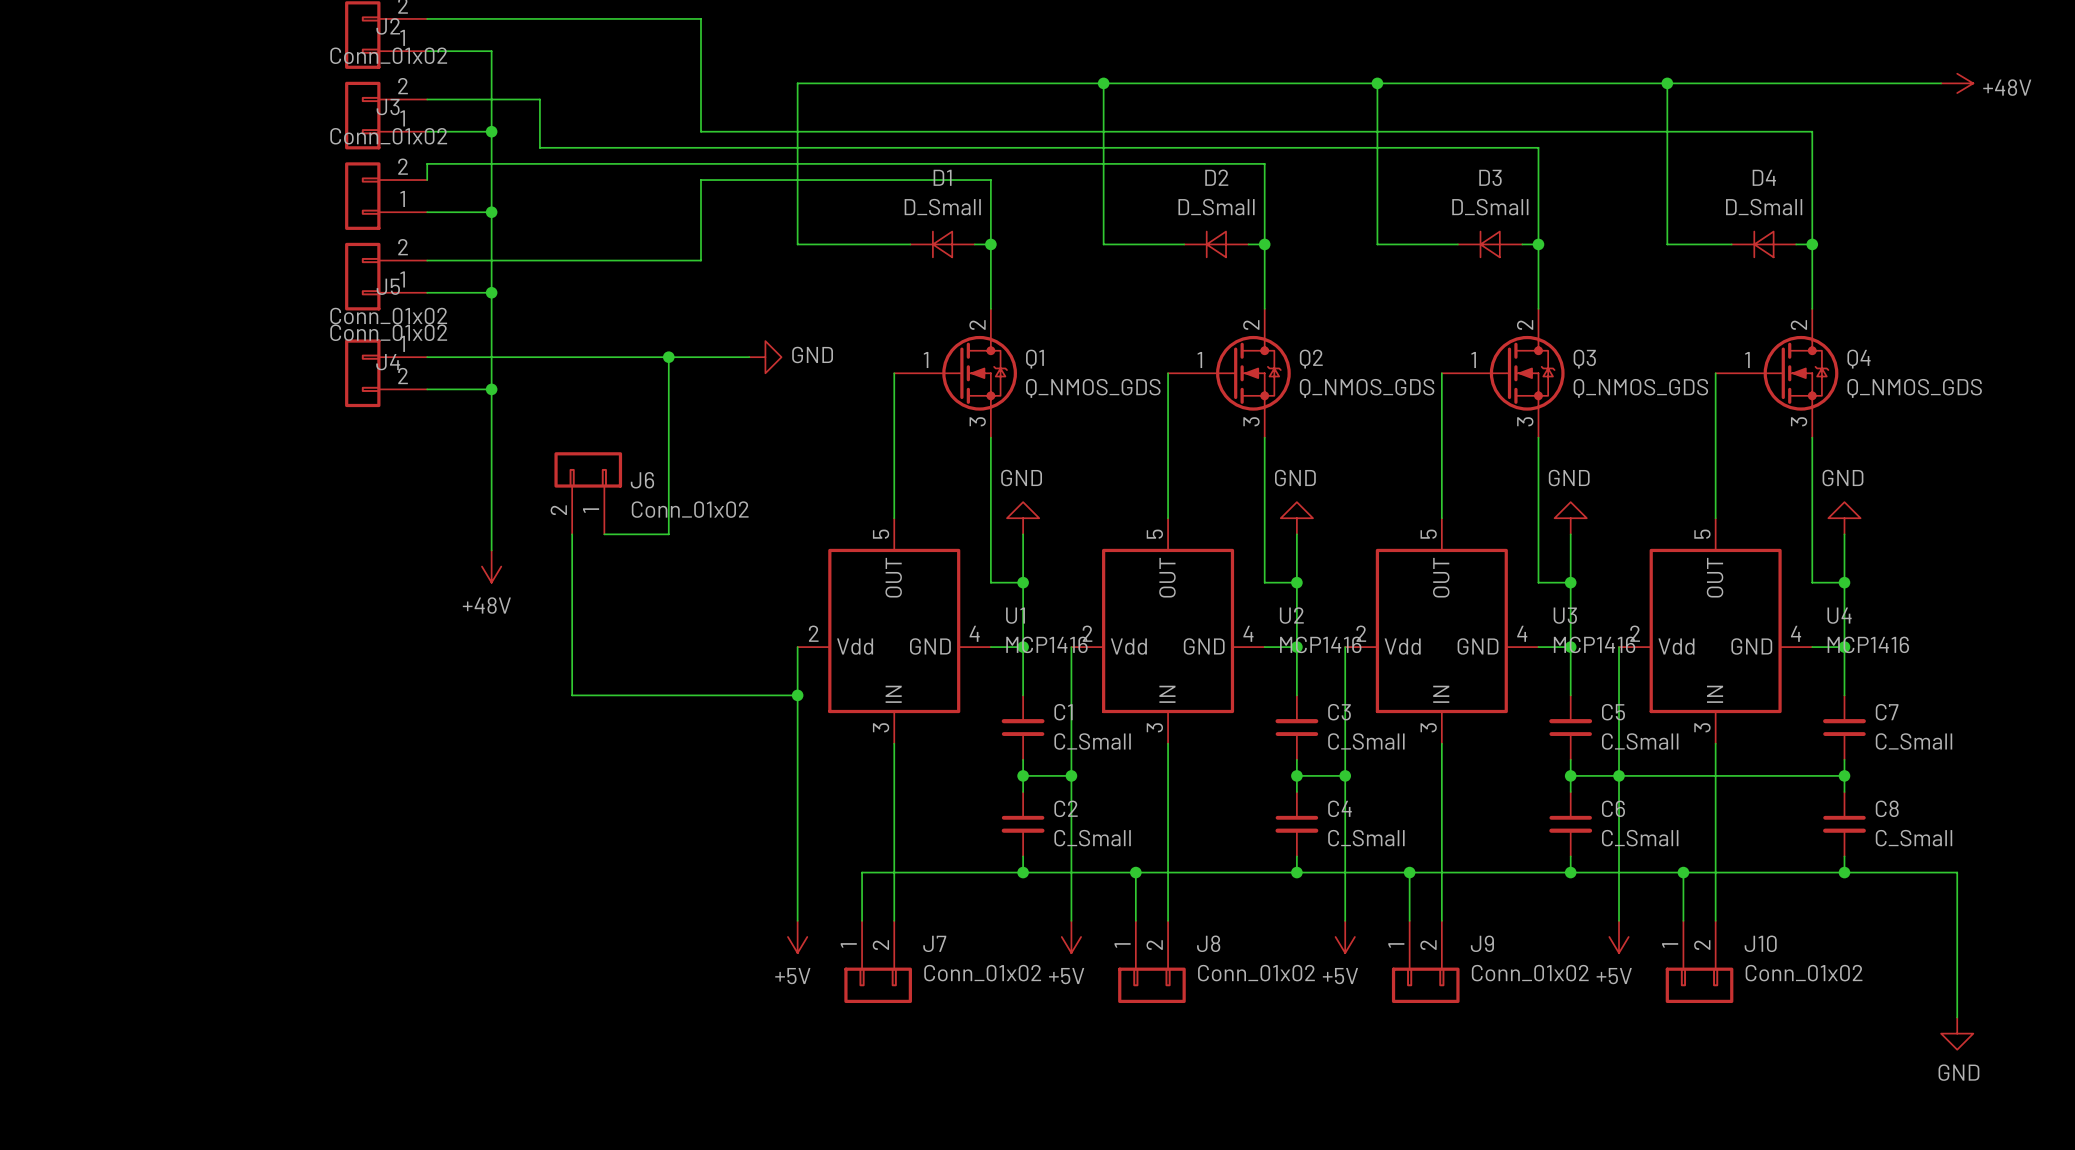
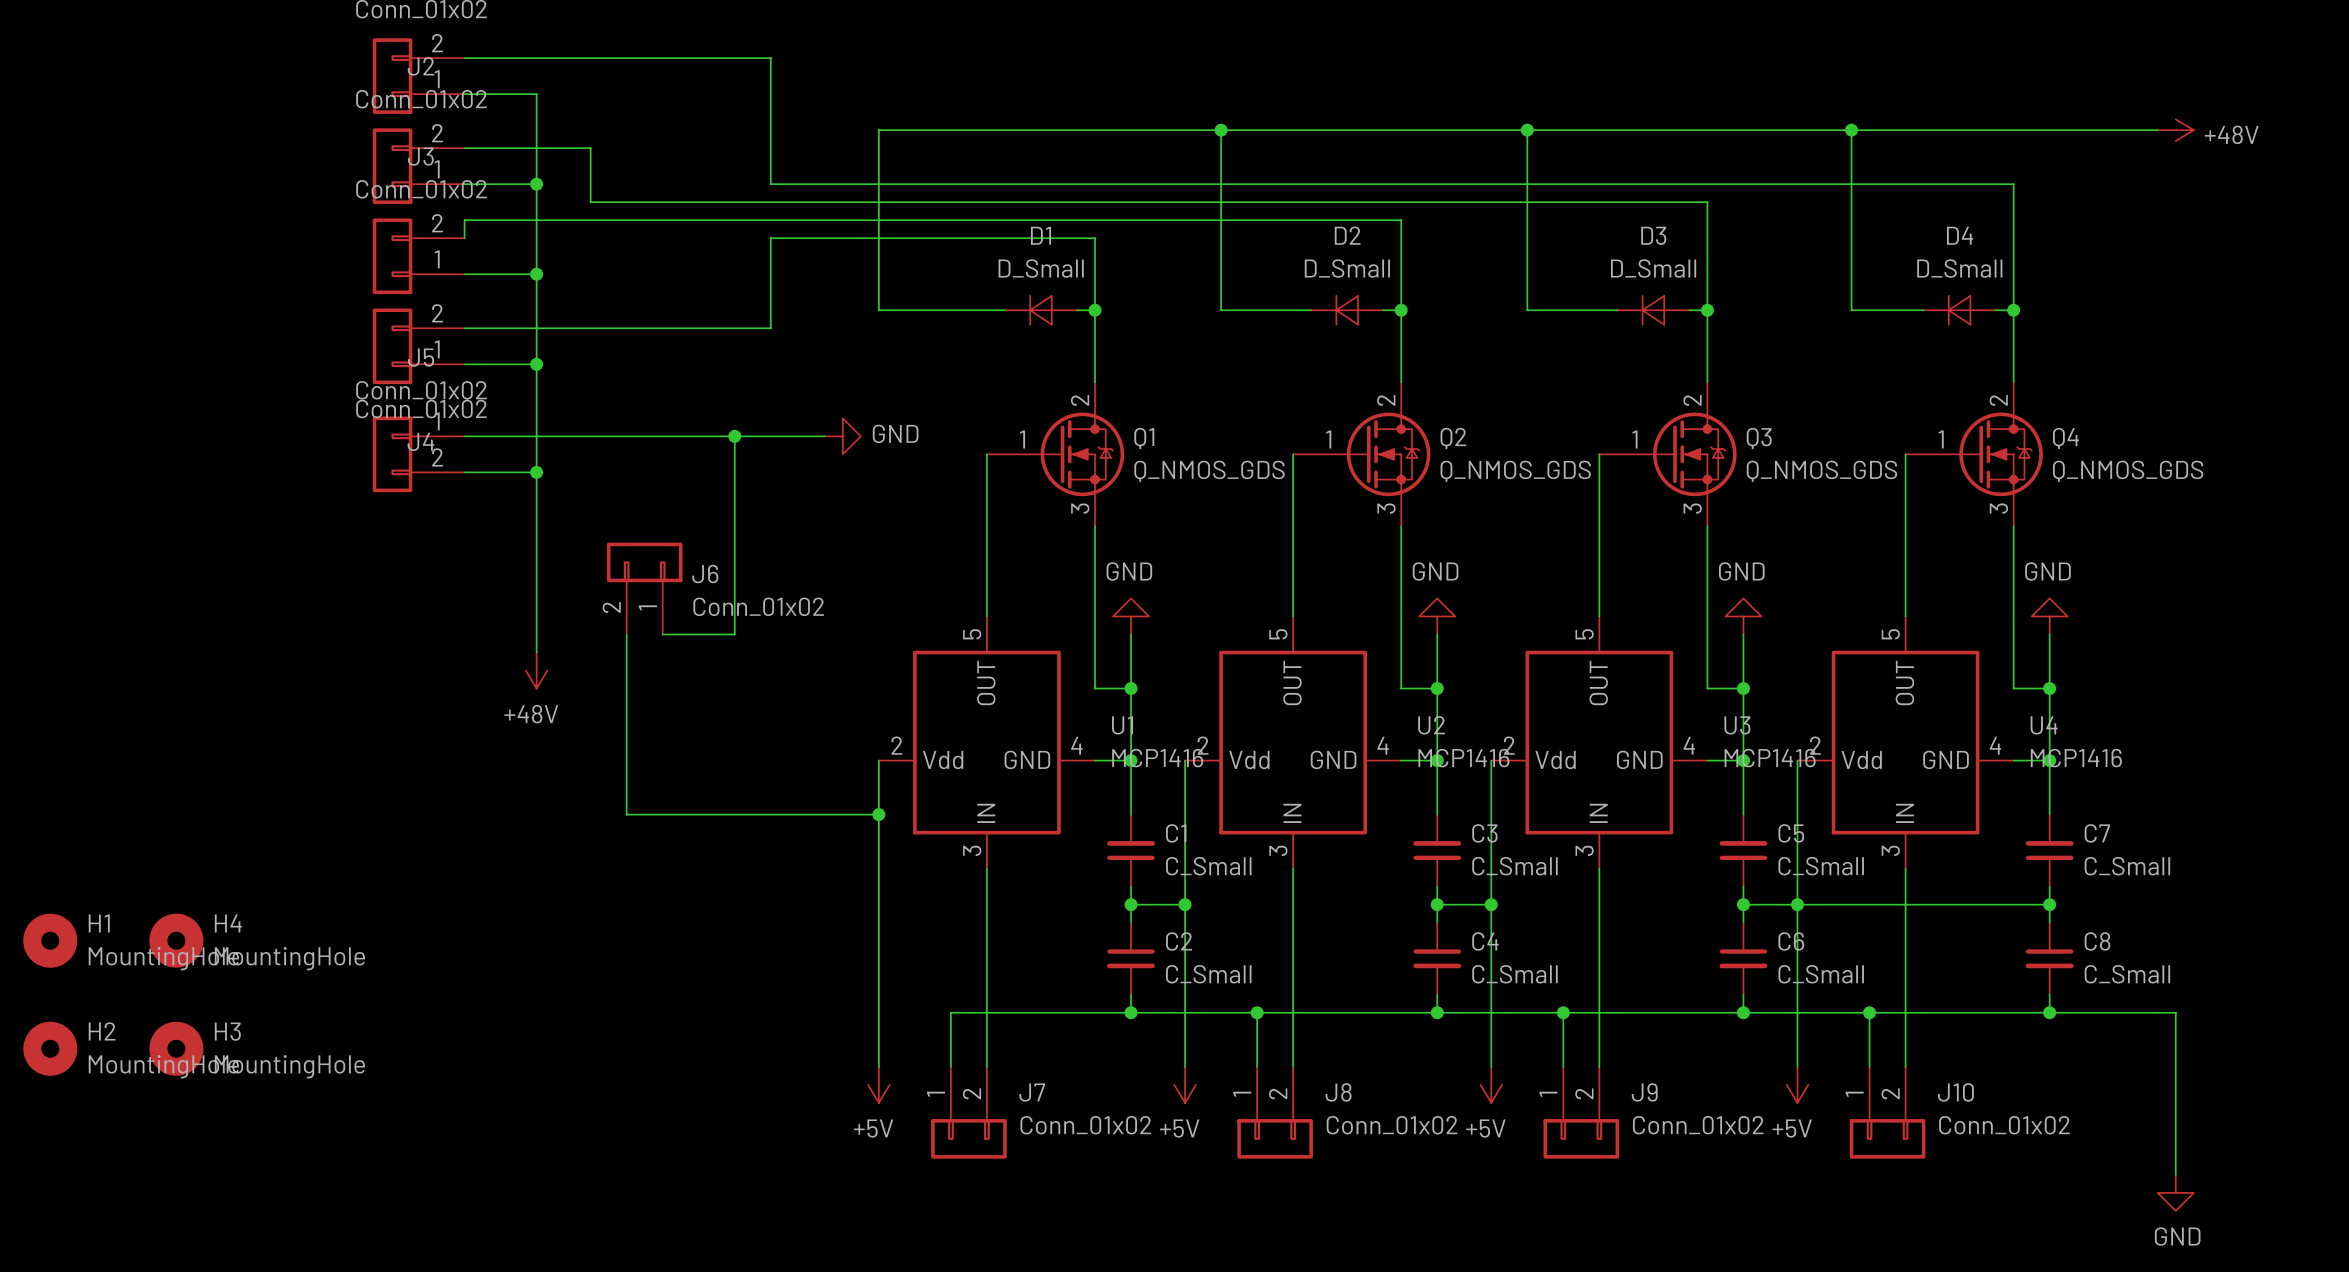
H1: none -> MountingHole (50, 940)
H4: none -> MountingHole (176, 940)
H2: none -> MountingHole (50, 1048)
H3: none -> MountingHole (176, 1048)

